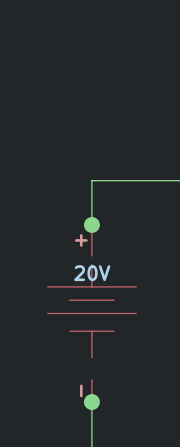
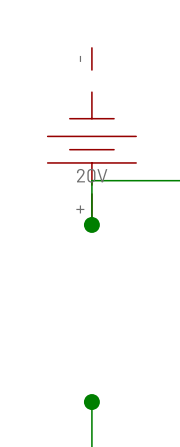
part rotation: 0° (91, 311) -> 180° (91, 138)
part position: (91, 313) -> (91, 136)

